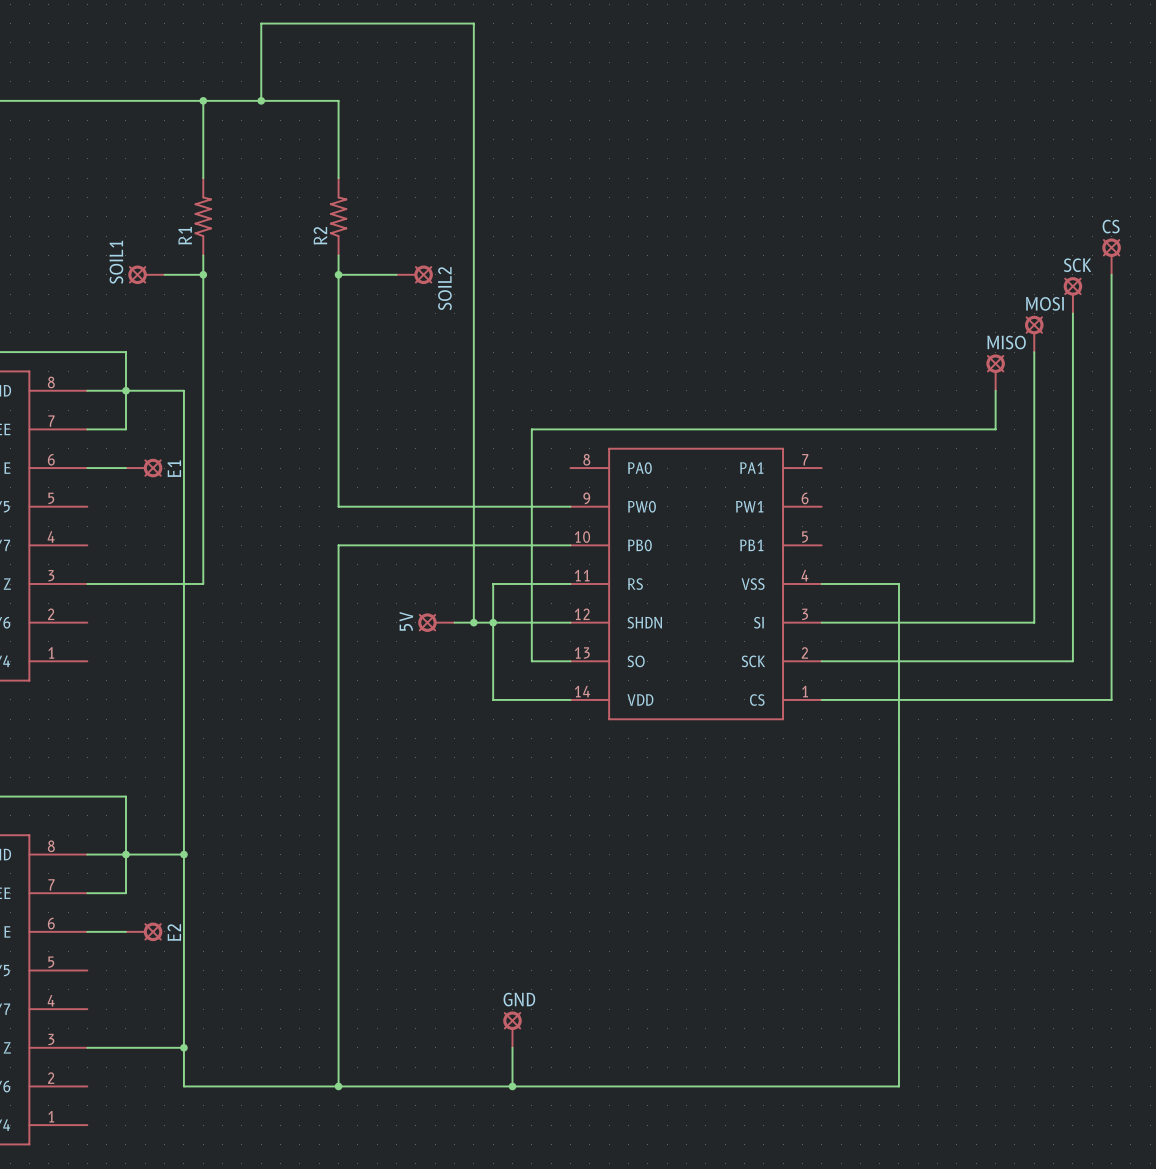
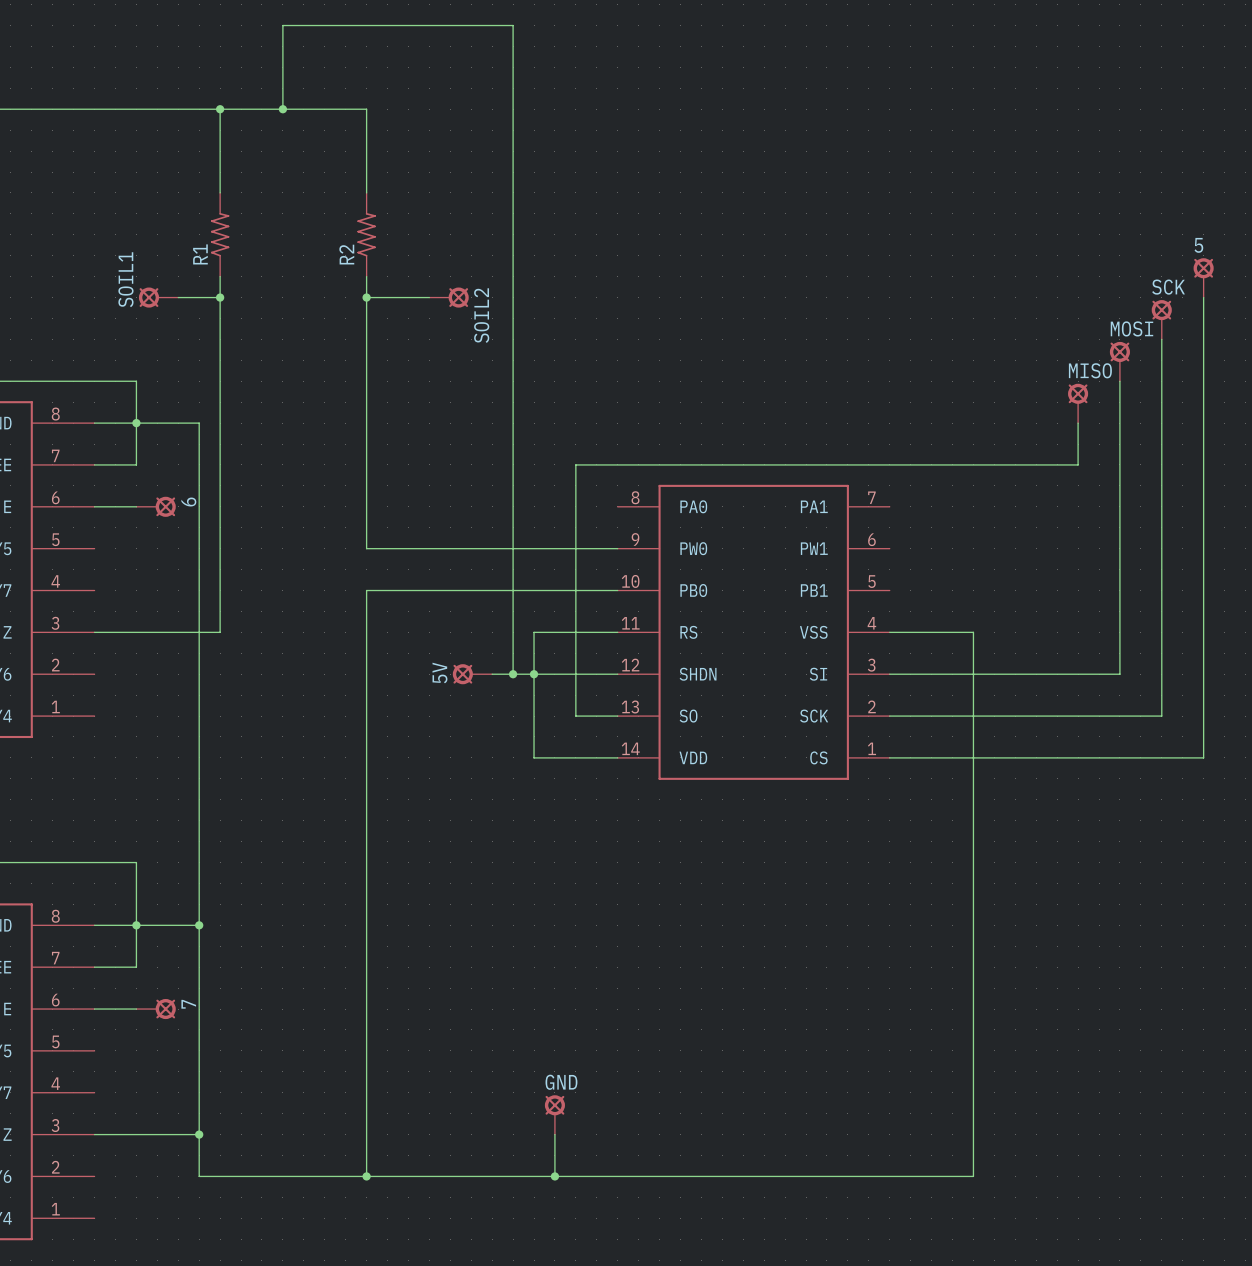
CS name: CS (1111, 226) -> 5 (1198, 245)
E1 name: E1 (174, 468) -> 6 (188, 502)
E2 name: E2 (174, 932) -> 7 (188, 1004)

